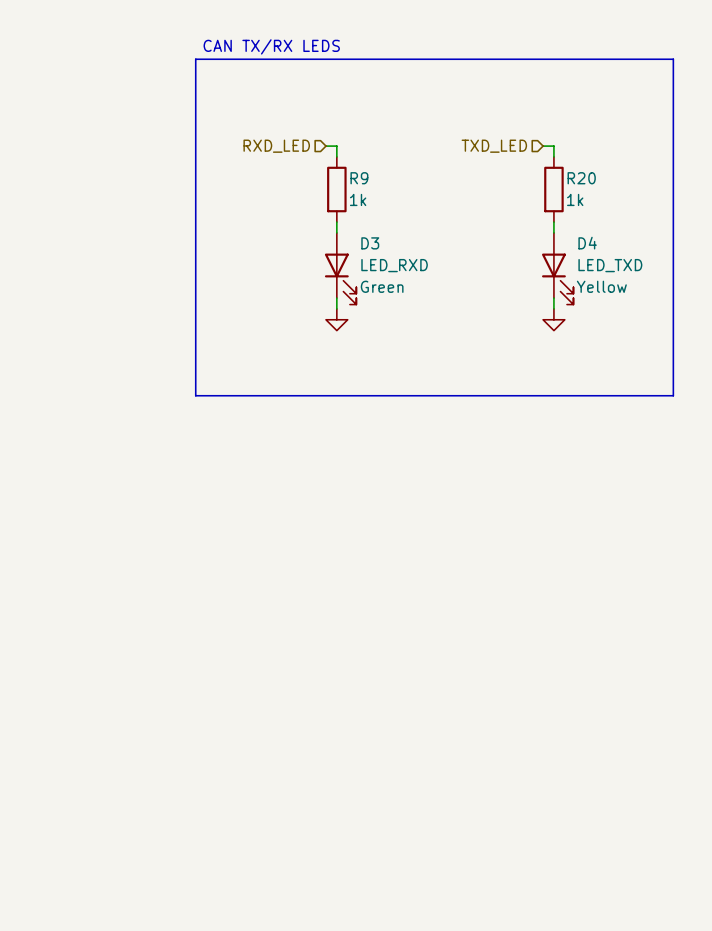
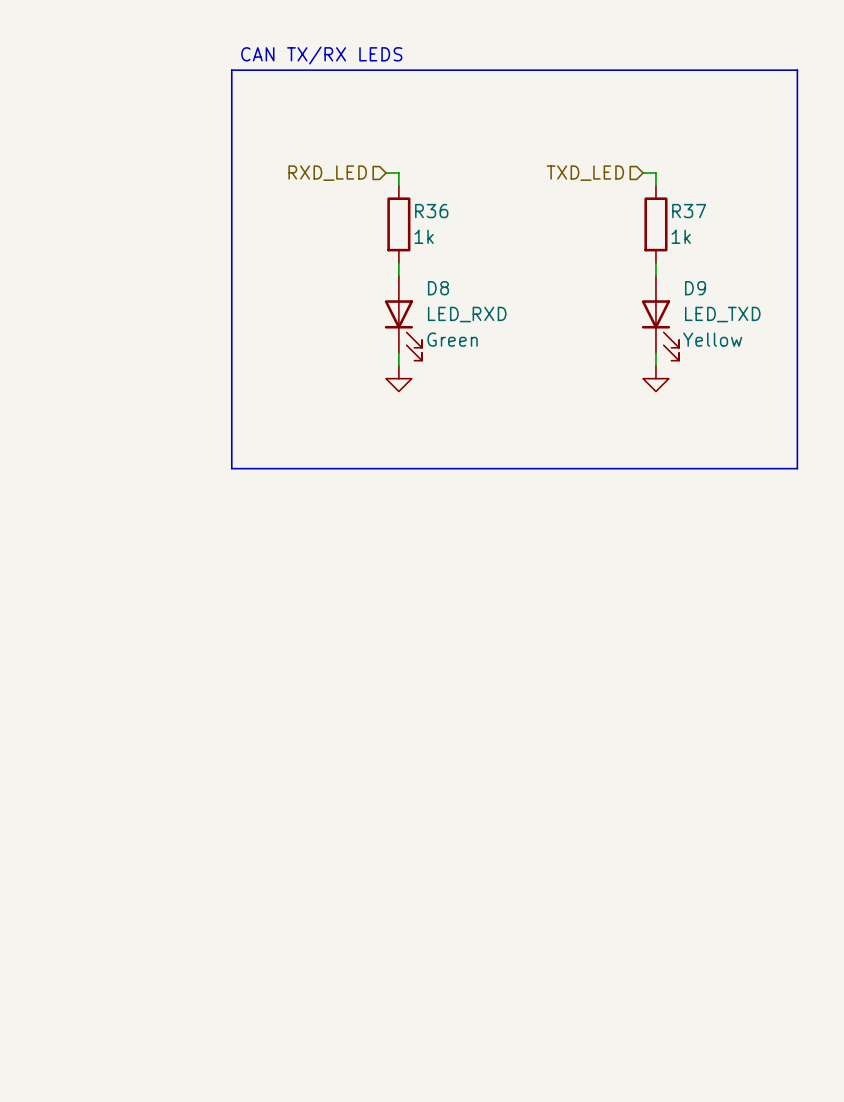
R9 name: R9 (359, 178) -> R36 (431, 211)
R20 name: R20 (581, 178) -> R37 (689, 211)
D3 name: D3 (370, 243) -> D8 (438, 288)
D4 name: D4 (587, 243) -> D9 (695, 288)

